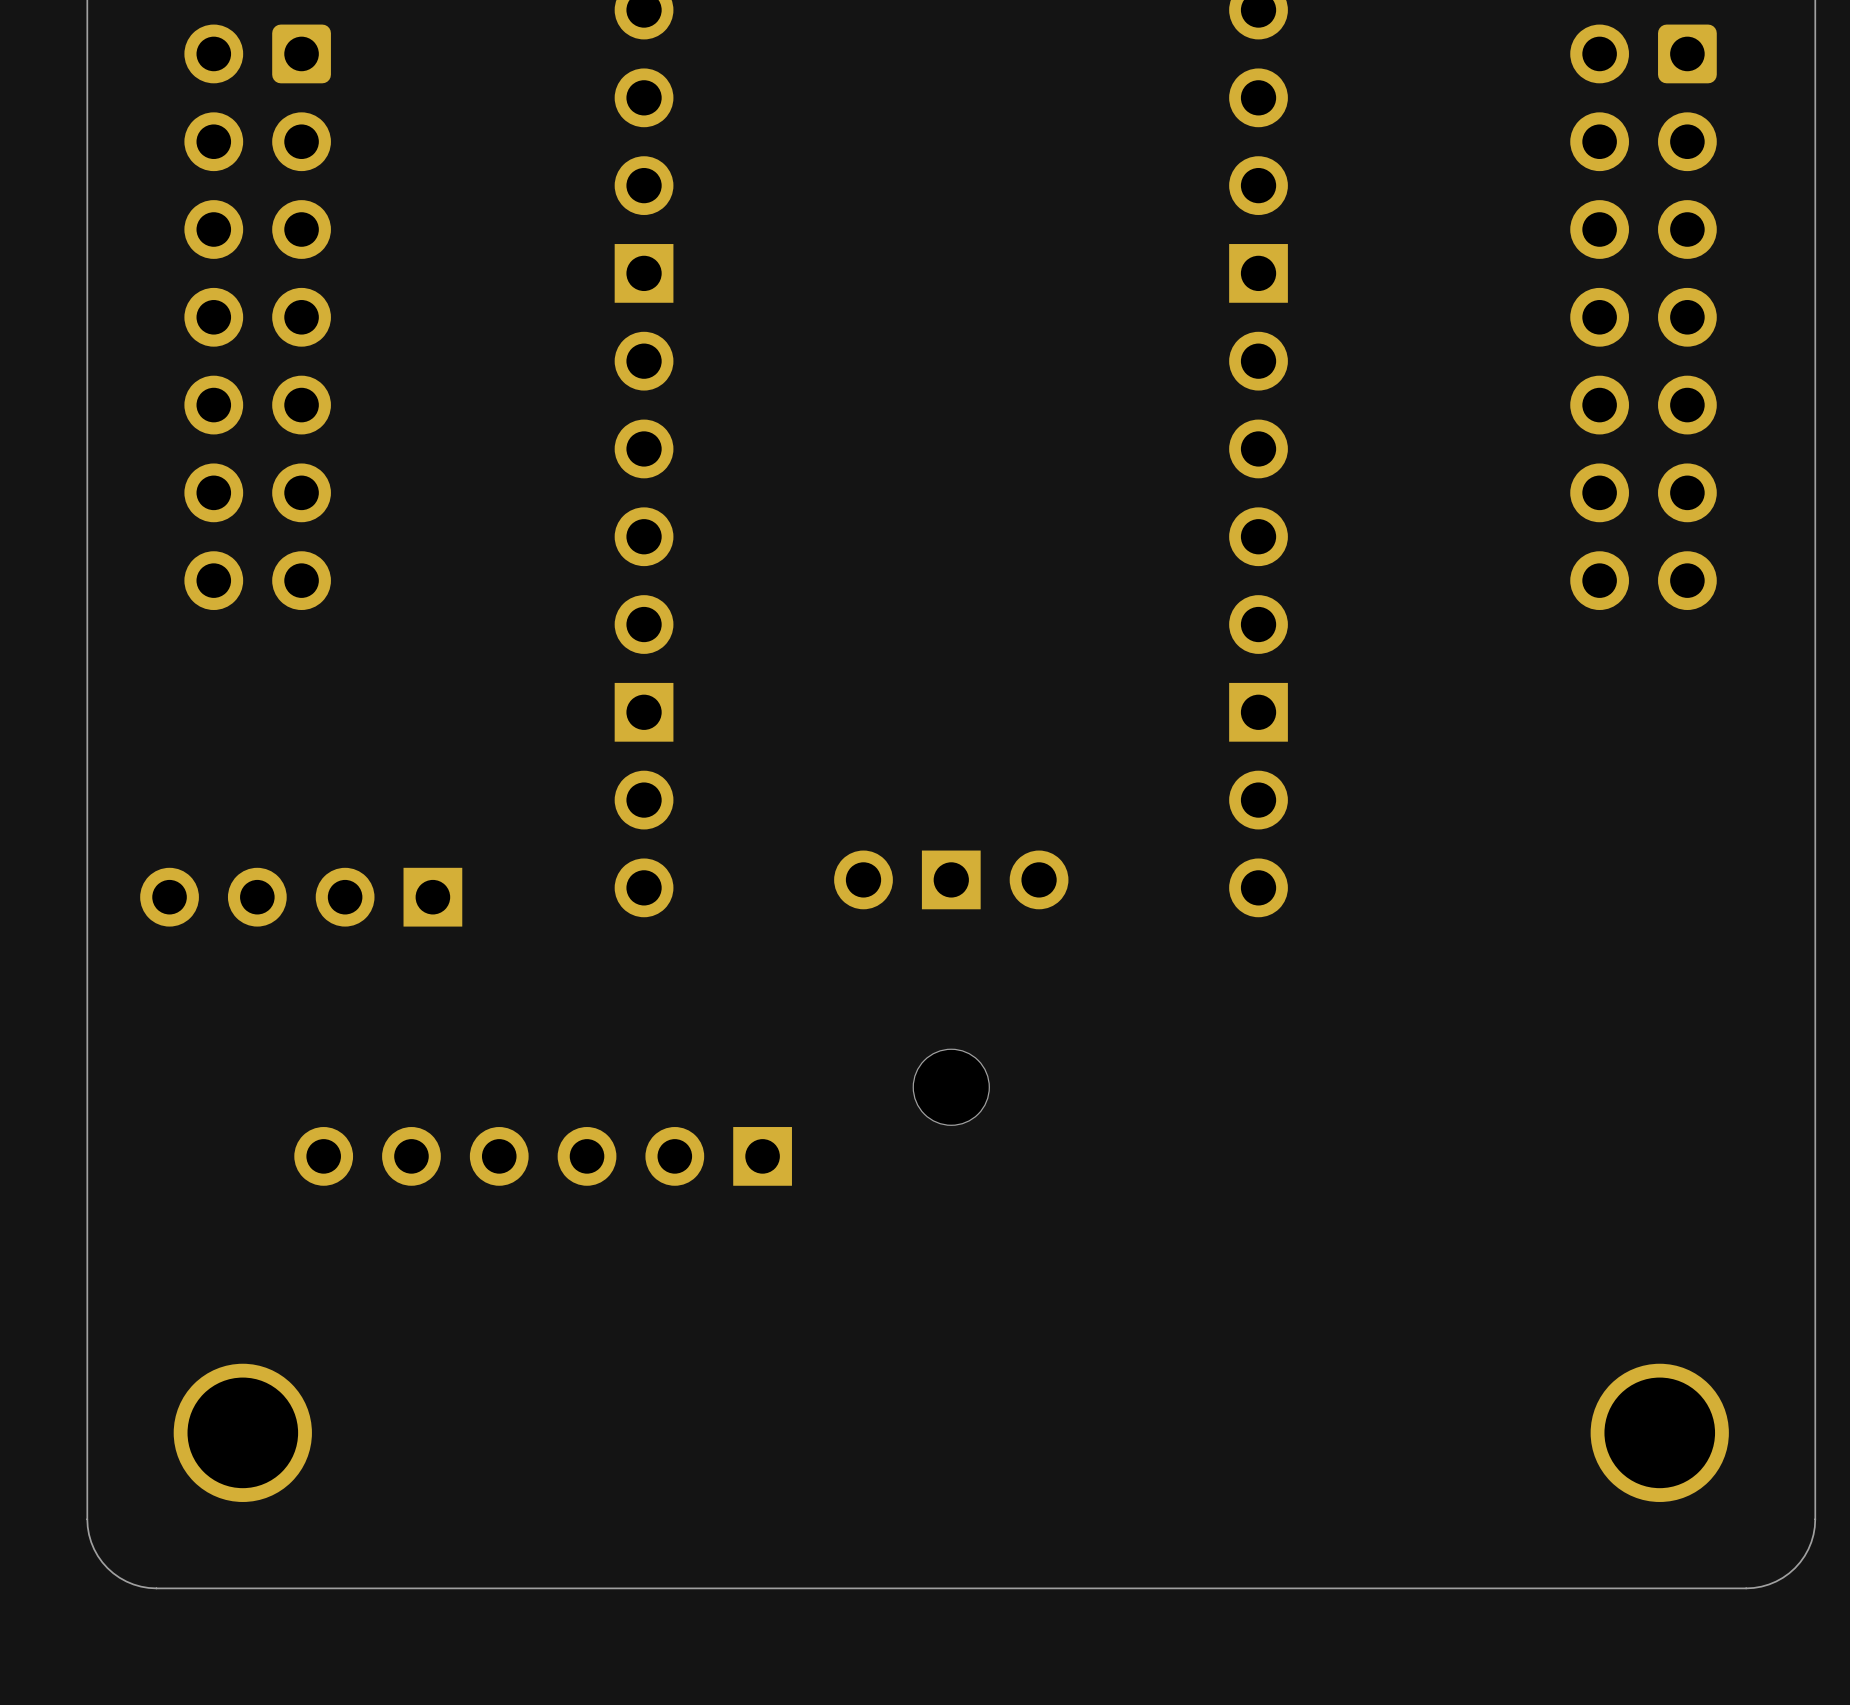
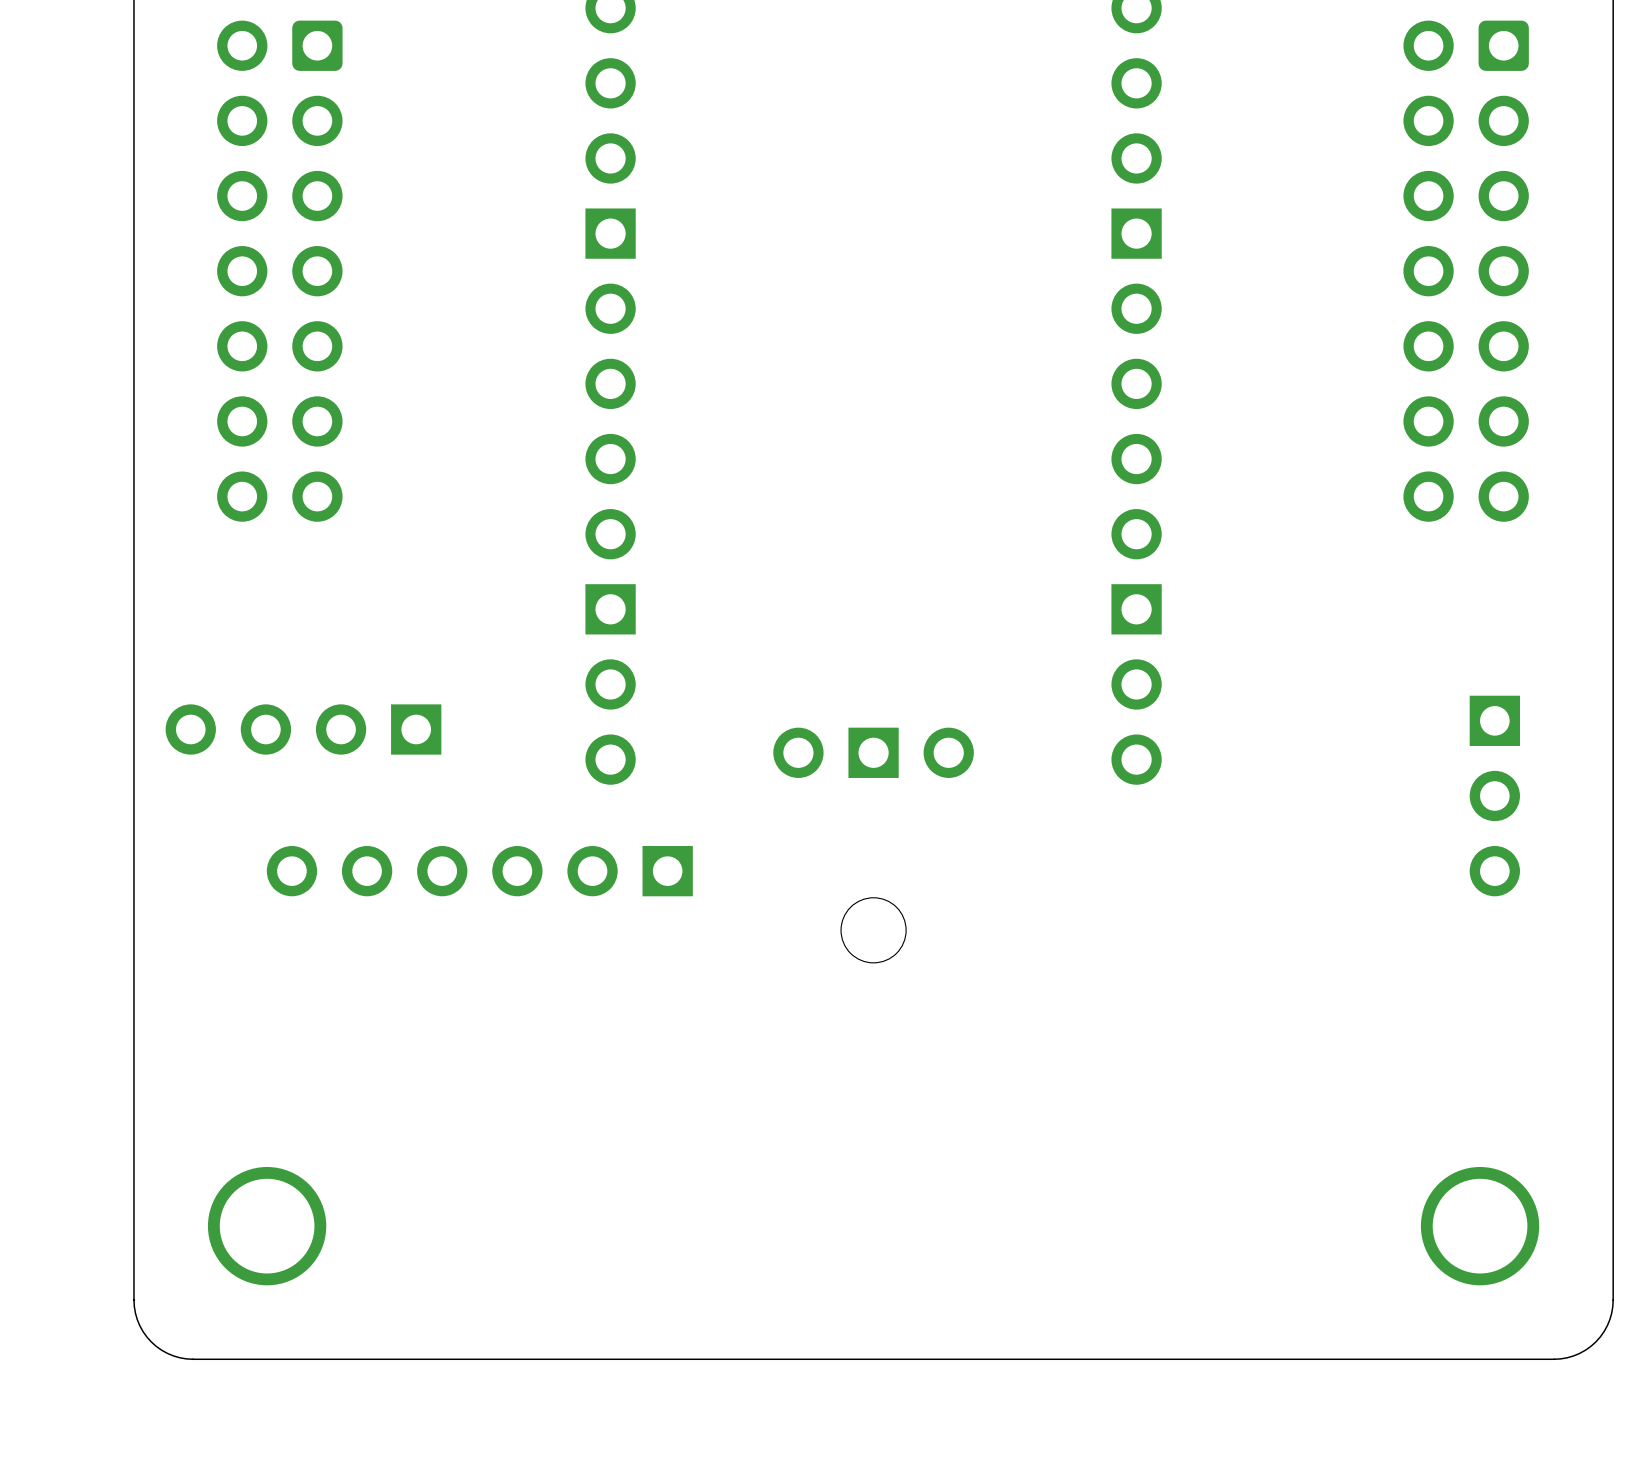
part position: (301, 897) -> (303, 729)
part: none -> (1494, 796)
part position: (543, 1156) -> (479, 871)

